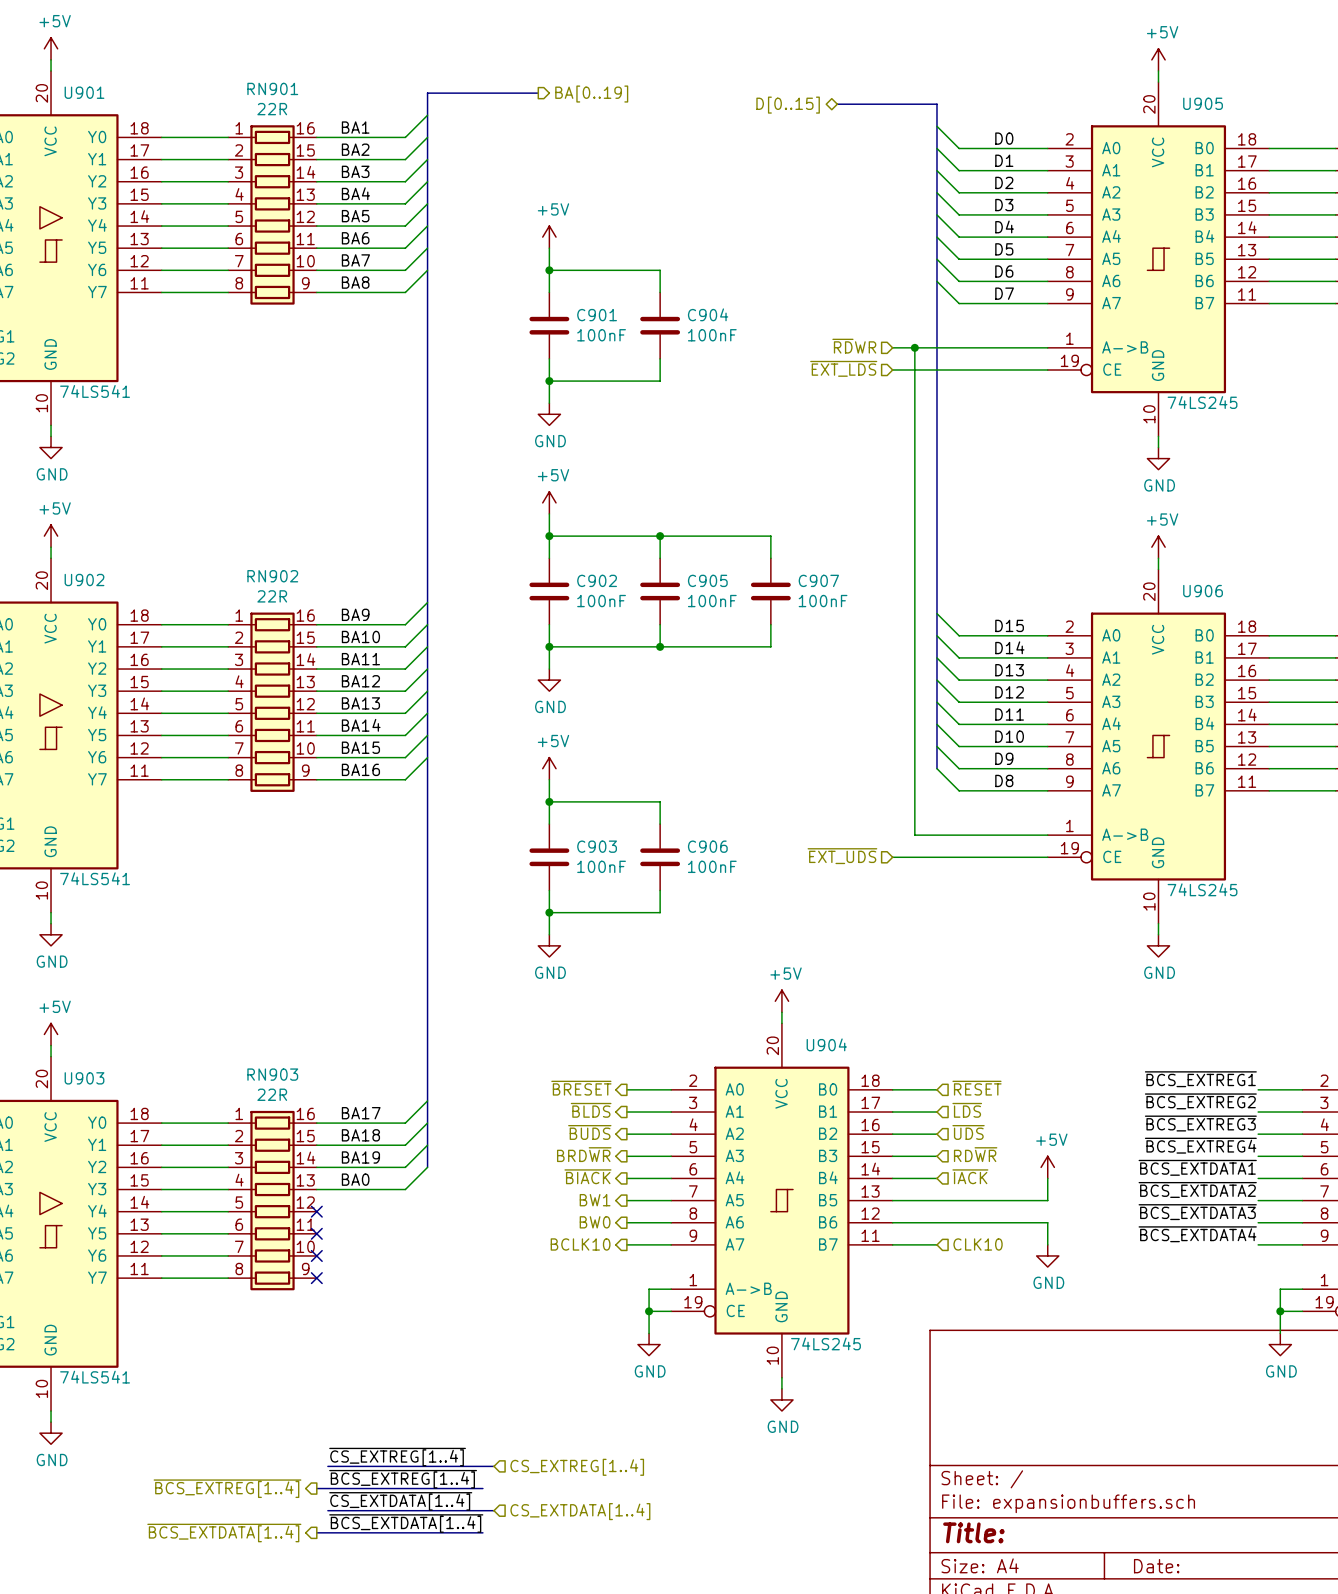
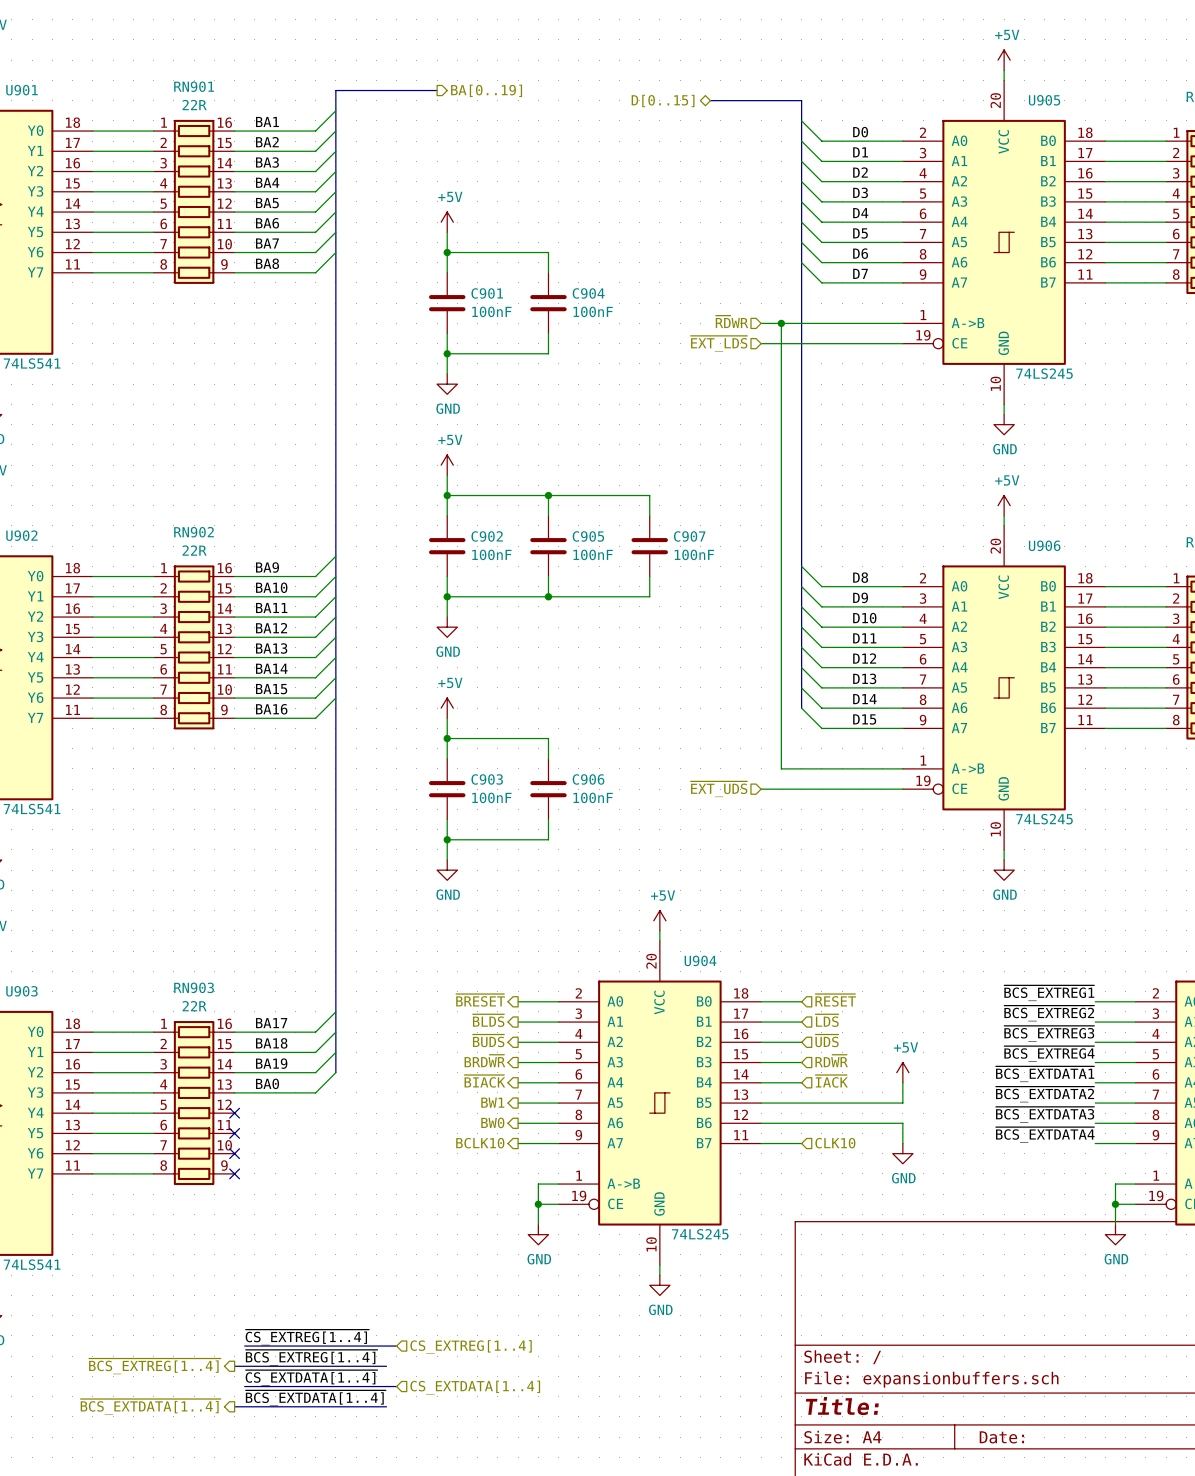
label: D15 (1009, 625) -> D8 (860, 577)
label: D14 (1009, 647) -> D9 (860, 597)
label: D13 (1009, 670) -> D10 (864, 618)
label: D12 (1009, 692) -> D11 (864, 638)
label: D11 (1009, 714) -> D12 (864, 658)
label: D10 (1009, 736) -> D13 (864, 678)
label: D9 (1004, 758) -> D14 (864, 699)
label: D8 (1004, 780) -> D15 (864, 719)

